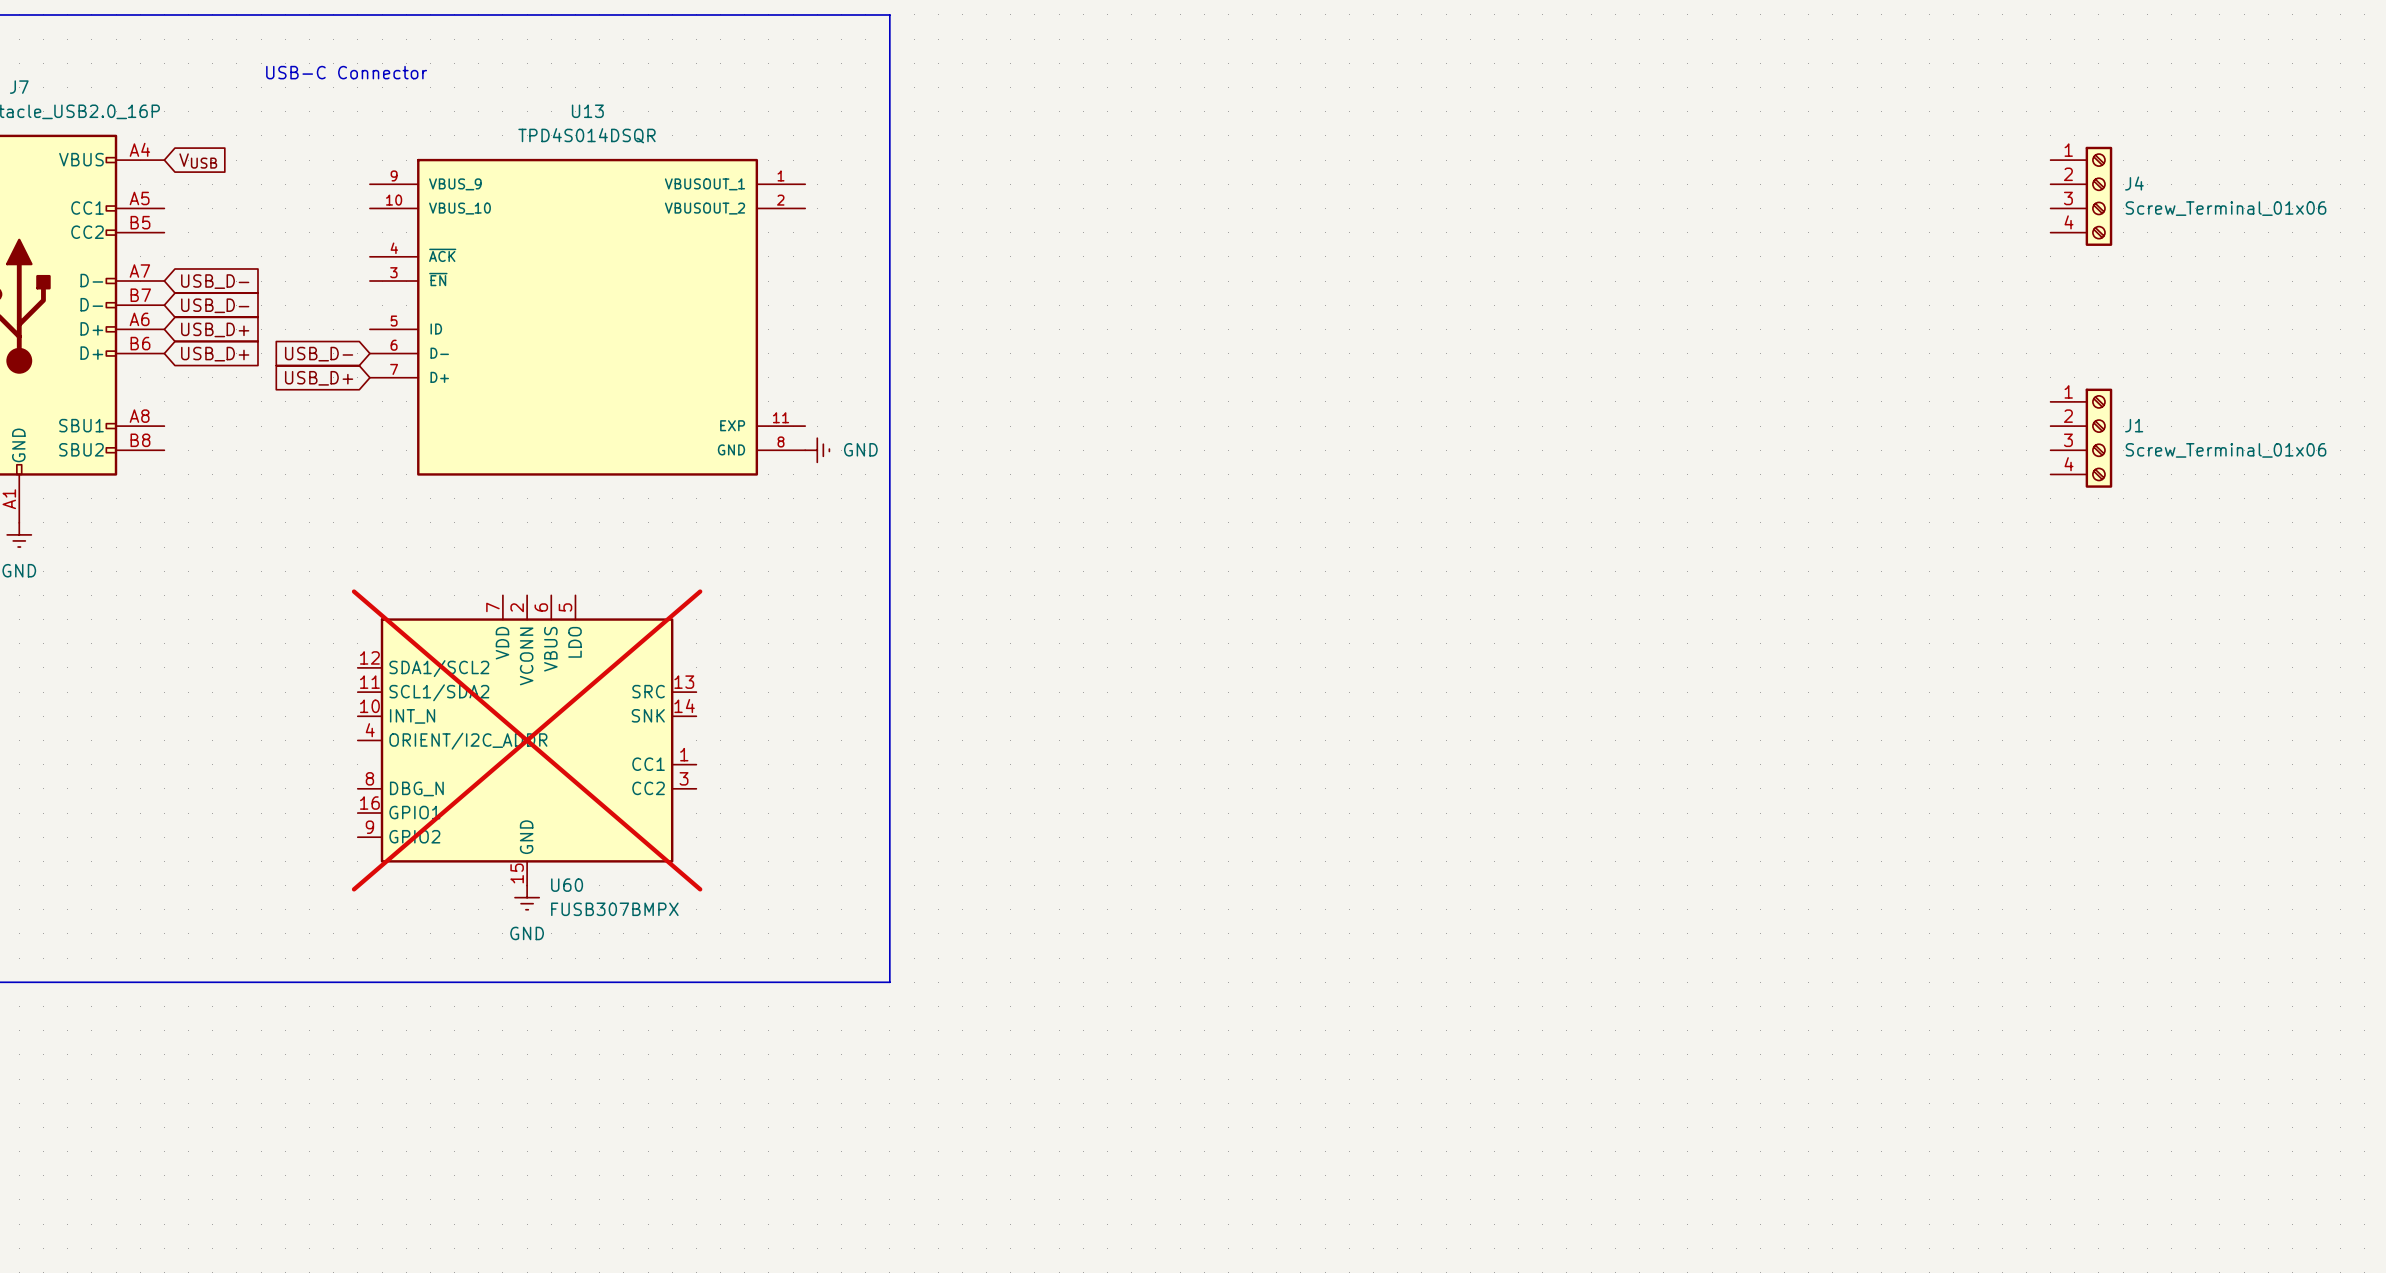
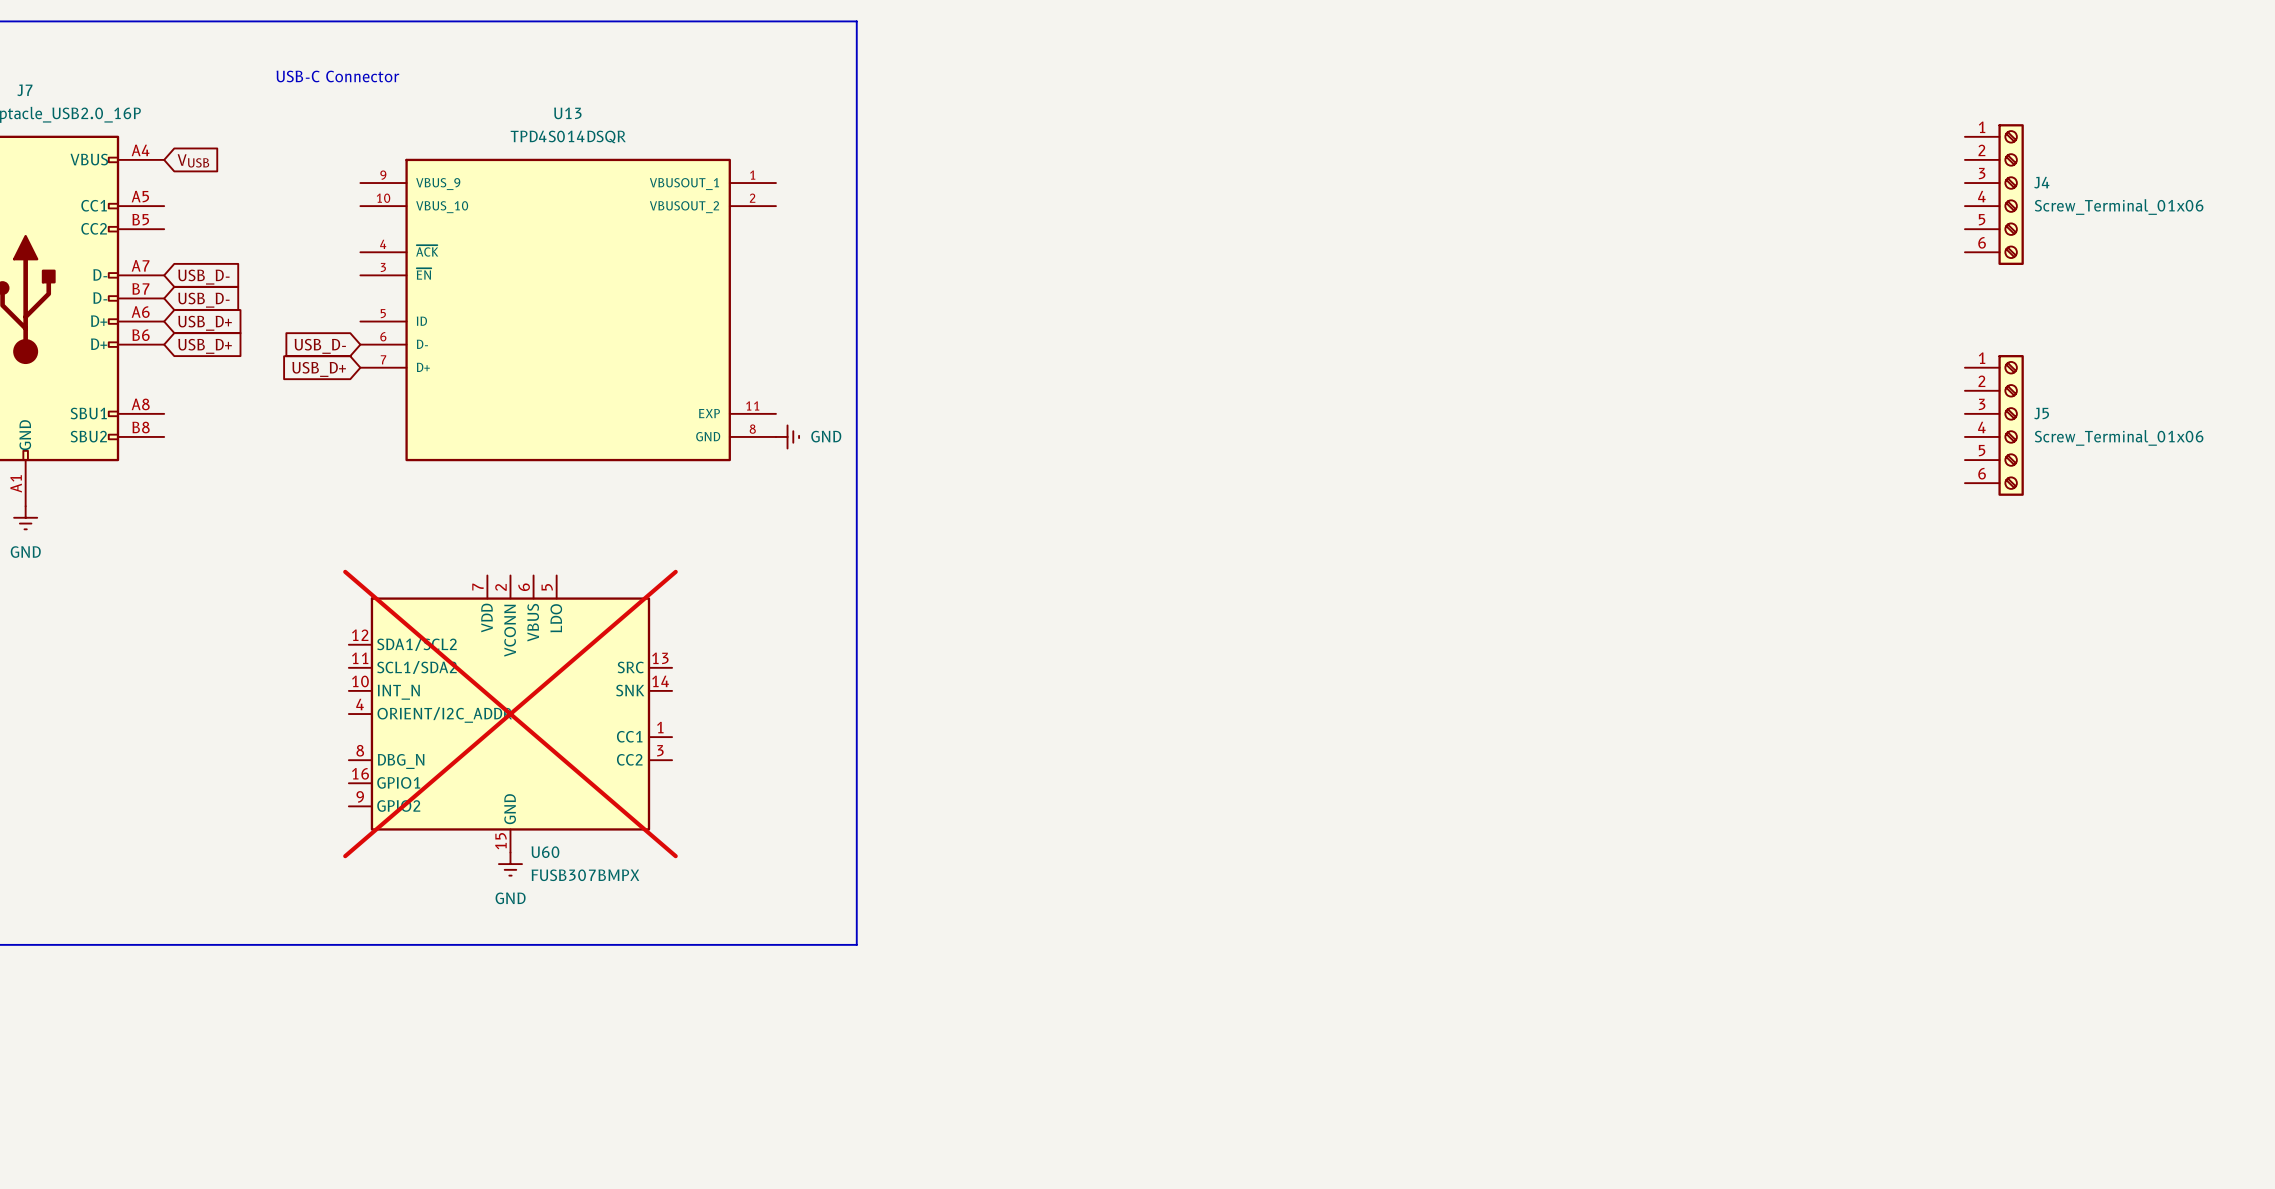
J4 symbol: [2050, 146, 2113, 246] -> [1964, 124, 2024, 265]
J1: Screw_Terminal_01x06 (2081, 438) -> none
J5: none -> Screw_Terminal_01x06 (1994, 425)

